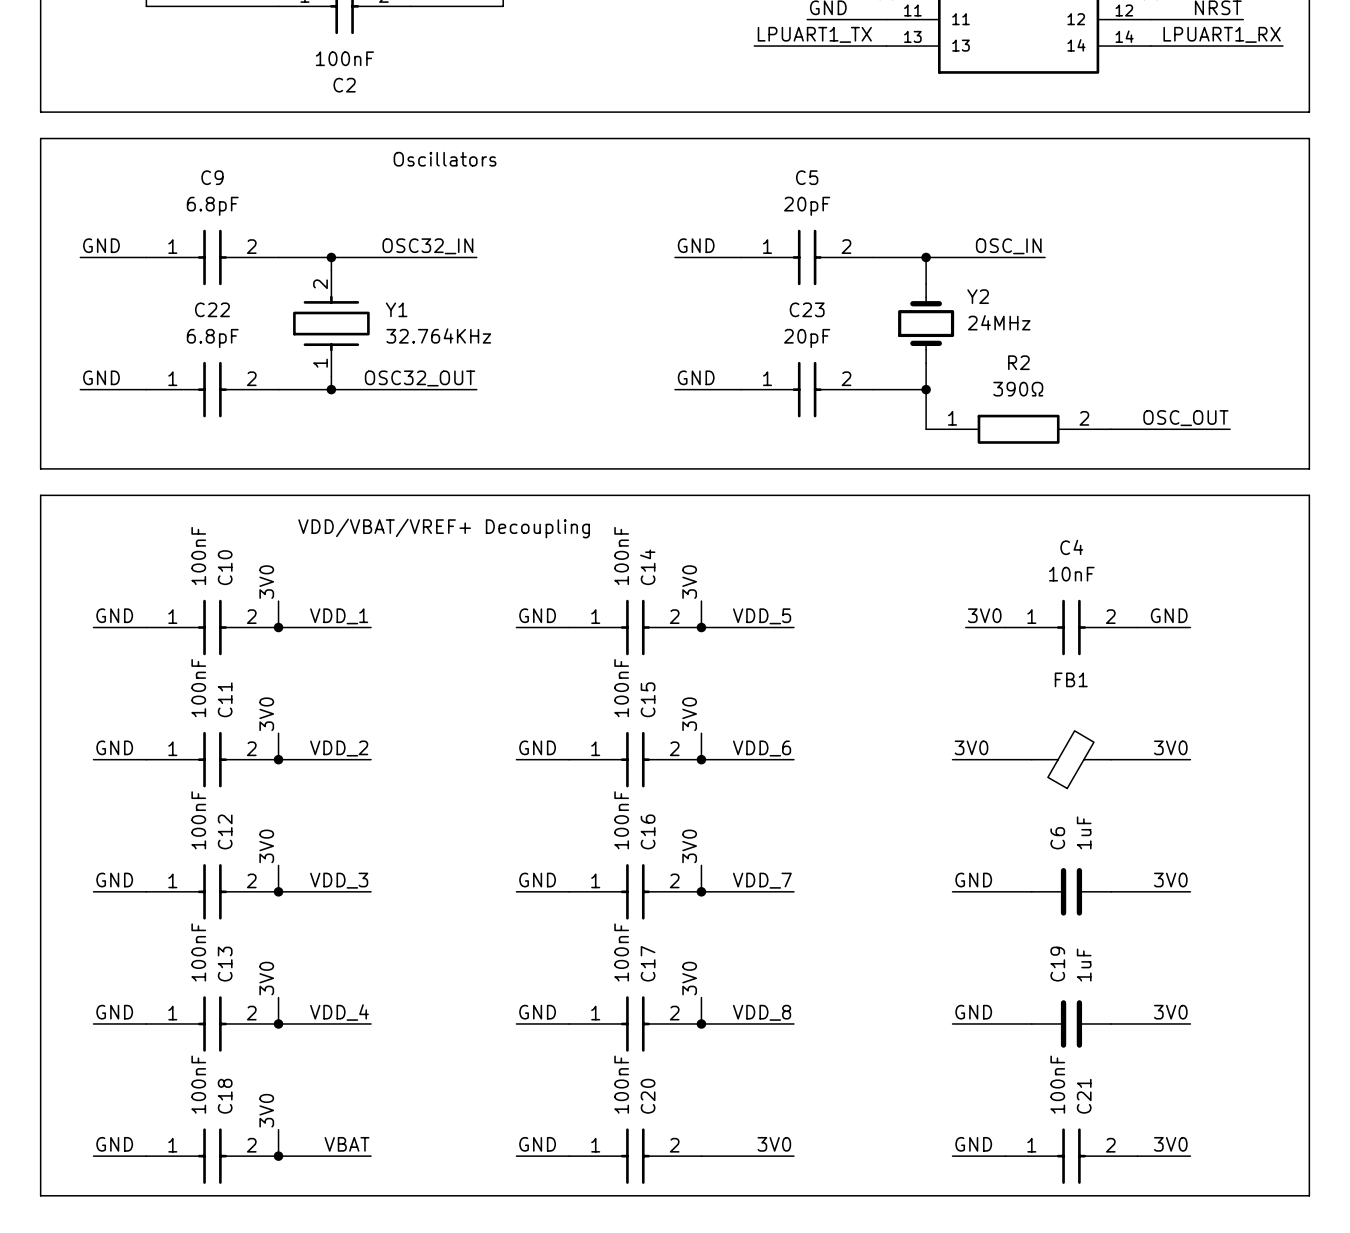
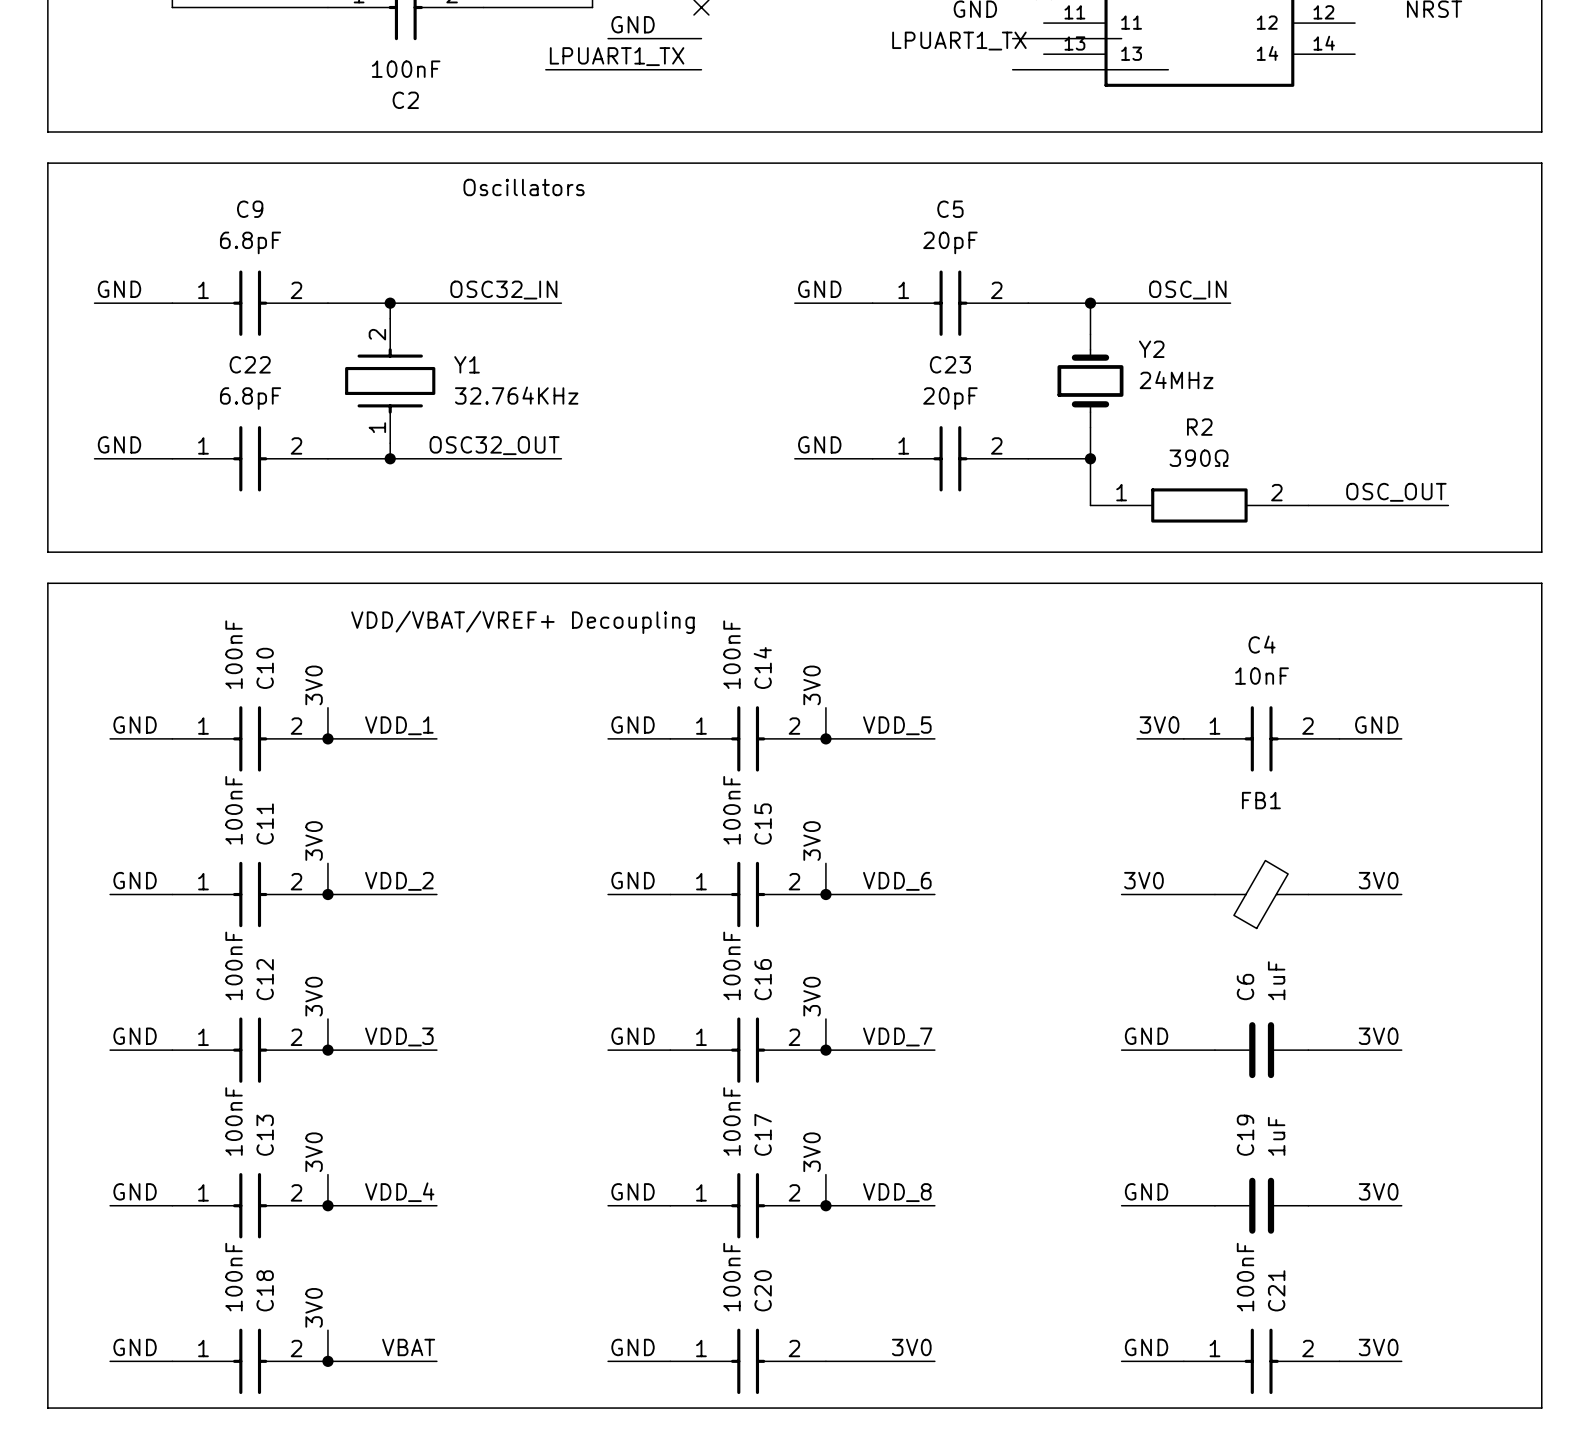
no-connect mark: none -> (701, 7)
wire: (807, 19) (886, 19) -> none
wire: (1150, 19) (1243, 19) -> none
label: none -> GND (633, 24)
wire: none -> (608, 38) (701, 38)
wire: none -> (1012, 38) (1121, 38)
label: LPUART1_RX (1222, 34) -> none
wire: (754, 46) (886, 46) -> (1012, 69) (1168, 69)
wire: (1150, 46) (1282, 46) -> none
label: none -> LPUART1_TX (617, 56)
wire: none -> (545, 69) (701, 69)

